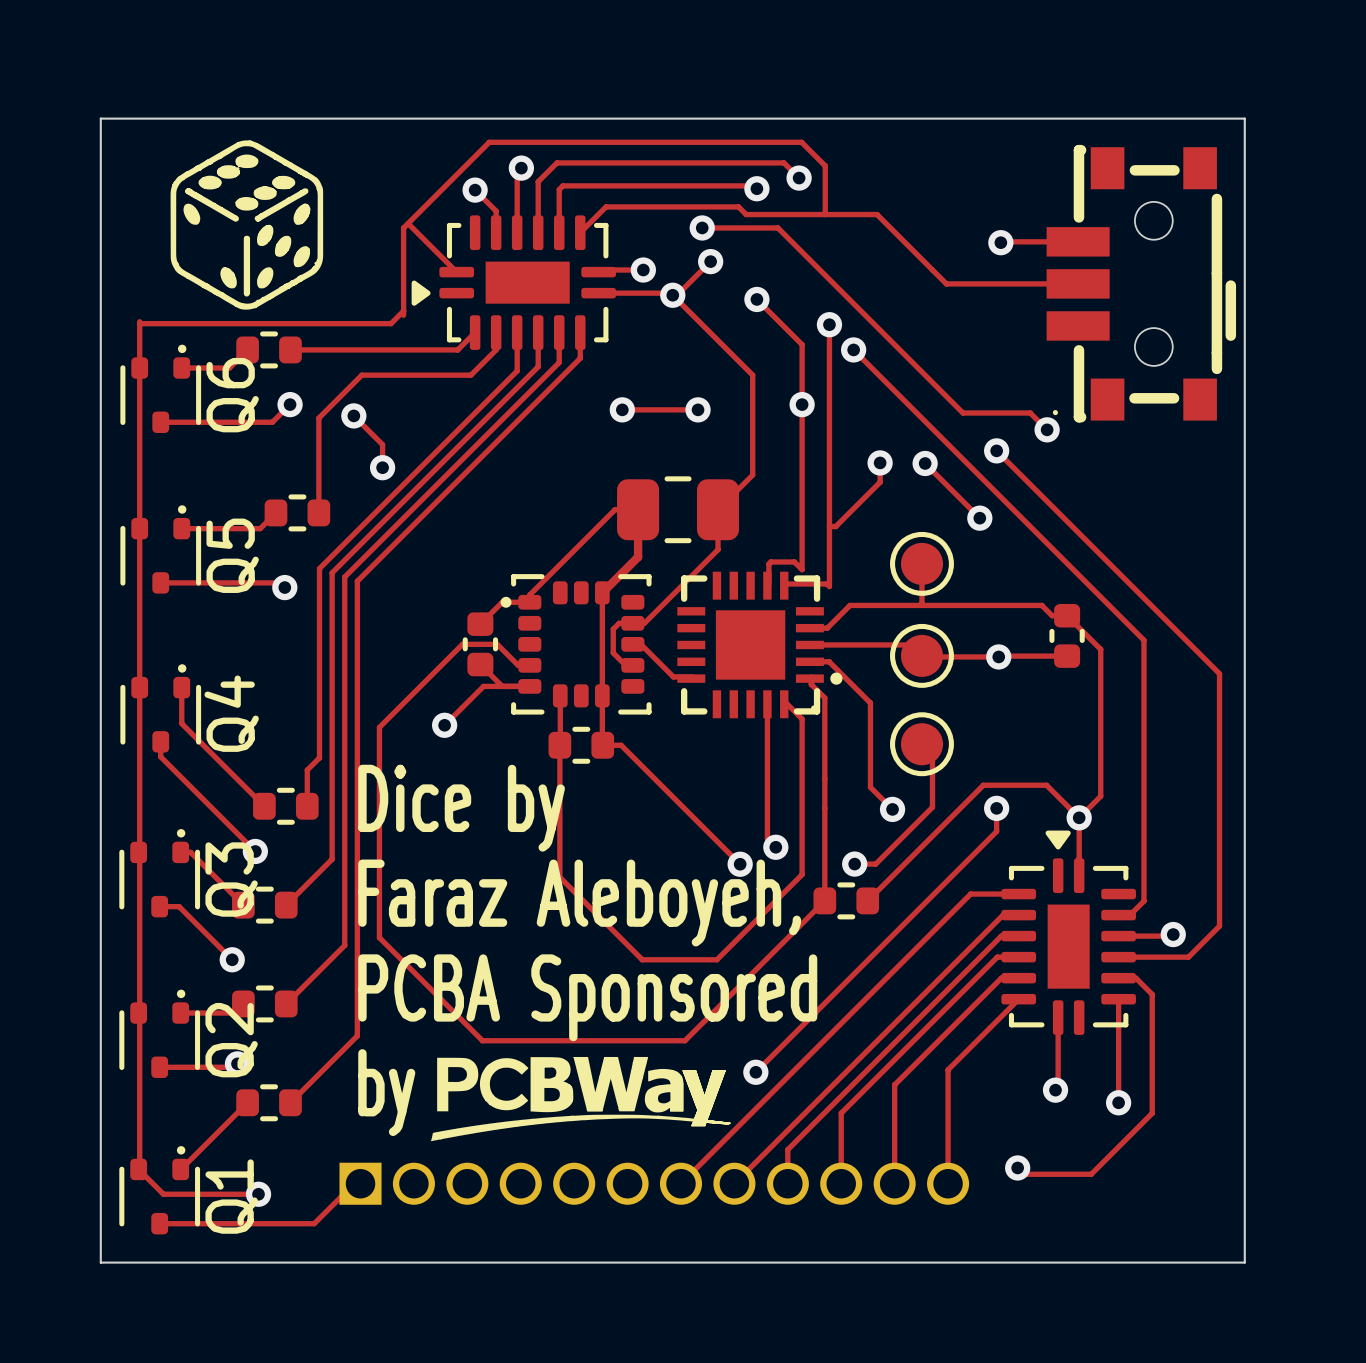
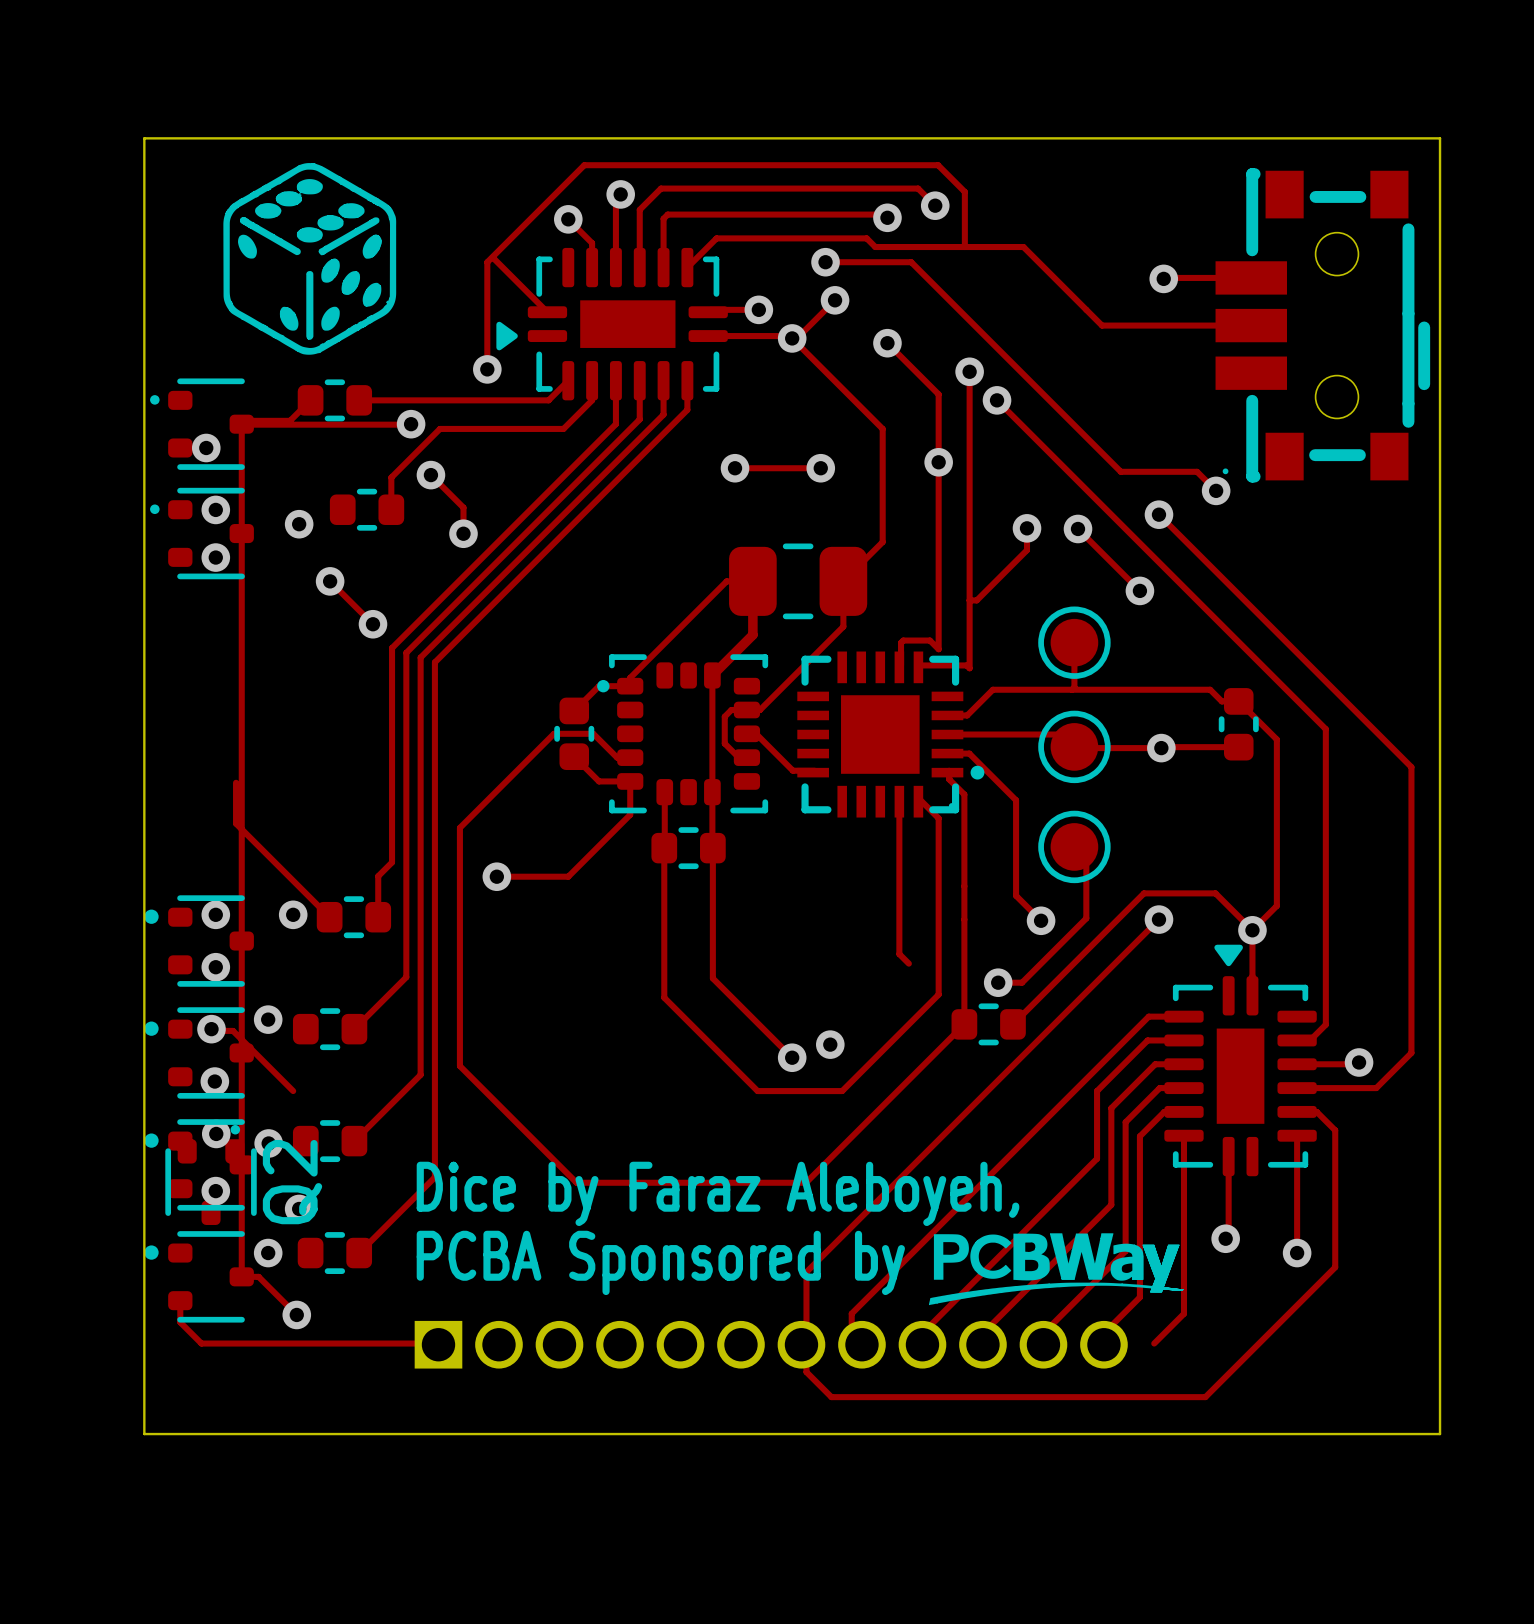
track: (403, 311) (391, 323) (139, 323) -> none
track: (139, 321) (138, 1169) (163, 1194) (258, 1194) -> none
via: none -> (487, 369)
part: none -> (201, 424)
track: none -> (241, 424) (241, 1276) (258, 1276) (296, 1314)
via: none -> (411, 424)
track: none -> (242, 424) (410, 424)
Q6: (160, 388) -> none
via: none -> (206, 447)
track: (290, 404) (272, 422) (160, 422) -> none
via: (290, 404) -> none
via: none -> (215, 509)
track: (318, 446) (318, 512) -> none
via: none -> (299, 524)
part: none -> (201, 533)
via: none -> (215, 557)
track: none -> (330, 581) (372, 624)
via: none -> (330, 581)
track: (275, 512) (260, 528) (181, 528) -> none
part position: (297, 512) -> (367, 509)
via: none -> (372, 624)
Q5: (160, 549) -> none
track: (160, 582) (280, 582) (284, 587) -> none
via: (284, 587) -> none
track: (502, 686) (483, 686) (444, 725) -> none
track: none -> (630, 781) (630, 814) (568, 876) (496, 876)
Q4: (160, 708) -> none
via position: (444, 725) -> (496, 876)
track: (160, 741) (160, 756) (255, 851) -> none
track: (602, 745) (621, 745) (740, 864) -> (712, 848) (712, 978) (792, 1057)
via: none -> (215, 914)
via: none -> (293, 914)
text: Dice by (461, 808) -> none
track: (996, 808) (996, 831) (755, 1072) (752, 1072) -> none
part: none -> (199, 941)
via: (775, 847) -> none
via: none -> (215, 967)
via: (255, 851) -> none
track: (180, 852) (190, 852) (243, 905) -> none
via: (740, 864) -> none
Q3: (159, 873) -> none
track: (987, 894) (970, 894) (681, 1183) -> (1148, 1016) (851, 1313) (851, 1343)
via: none -> (268, 1019)
text: Faraz Aleboyeh, (579, 903) -> none
via: none -> (211, 1029)
track: (1003, 915) (734, 1183) -> (1166, 1040) (1147, 1040) (1097, 1091) (1097, 1158) (912, 1343)
via: none -> (830, 1044)
part: none -> (199, 1052)
via: none -> (792, 1057)
track: (1001, 936) (787, 1149) (787, 1183) -> (1164, 1064) (1155, 1064) (1111, 1108) (1111, 1204) (972, 1343)
via: none -> (214, 1081)
via: (232, 959) -> none
track: (967, 987) (841, 1113) (841, 1183) -> (1125, 1122) (1125, 1251) (1033, 1343)
via: none -> (216, 1133)
text: PCBA Sponsored (587, 997) -> none
track: (979, 999) (894, 1084) (894, 1183) -> (1139, 1136) (1139, 1297) (1093, 1343)
track: (1018, 999) (948, 1069) (948, 1183) -> (1183, 1135) (1183, 1313) (1154, 1343)
track: (243, 1003) (234, 1013) (180, 1013) -> none
via: none -> (268, 1143)
part: none -> (199, 1164)
via: none -> (215, 1191)
text: none -> Dice by Faraz Aleboyeh, (717, 1193)
drawing: [431, 1056, 731, 1142] -> none
track: (237, 1063) (234, 1067) (159, 1067) -> none
via: (755, 1072) -> none
drawing: none -> [928, 1233, 1184, 1306]
text: by (386, 1092) -> PCBA Sponsored by (660, 1262)
via: none -> (268, 1253)
track: (247, 1102) (180, 1169) -> none
track: (1152, 1113) (1091, 1174) (1023, 1174) (1017, 1167) -> (1335, 1264) (1335, 1267) (1205, 1397) (831, 1397) (806, 1372) (806, 1272) (1158, 919)
part: none -> (199, 1276)
via: (1017, 1167) -> none
track: (355, 1182) (314, 1223) (159, 1223) -> (432, 1343) (201, 1343) (180, 1322) (180, 1300)
Q1: (159, 1190) -> none
via position: (258, 1194) -> (296, 1314)

